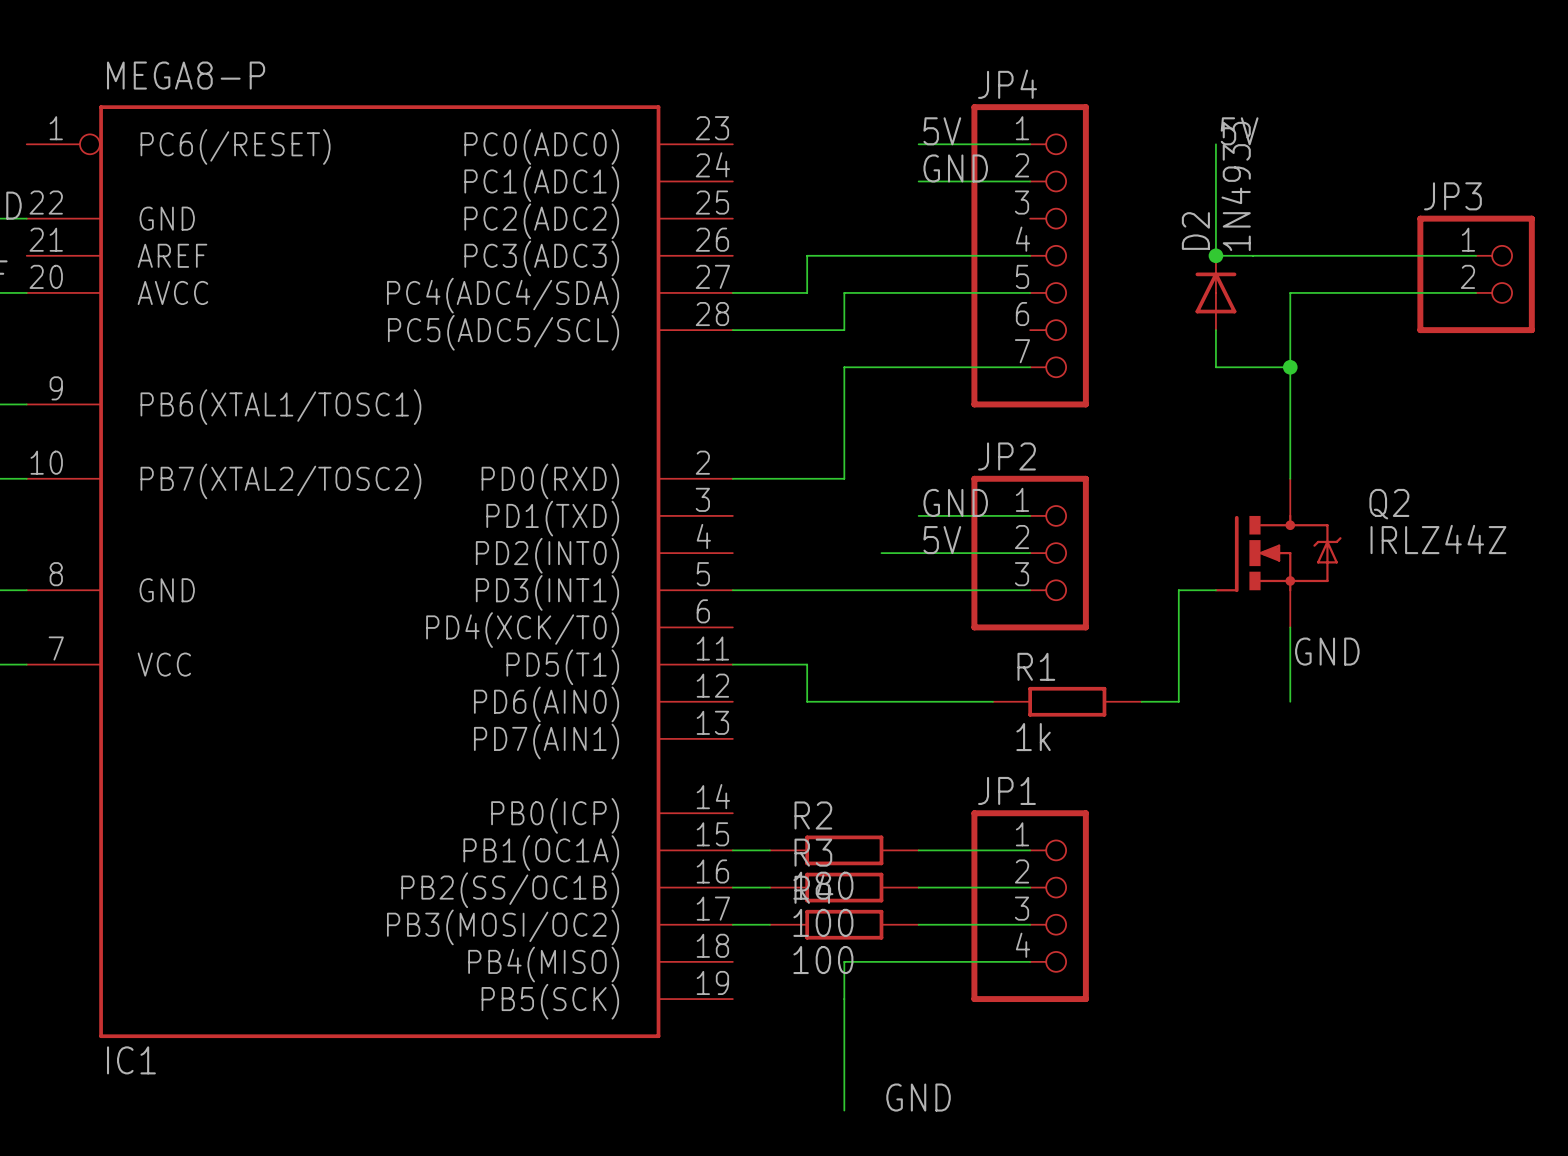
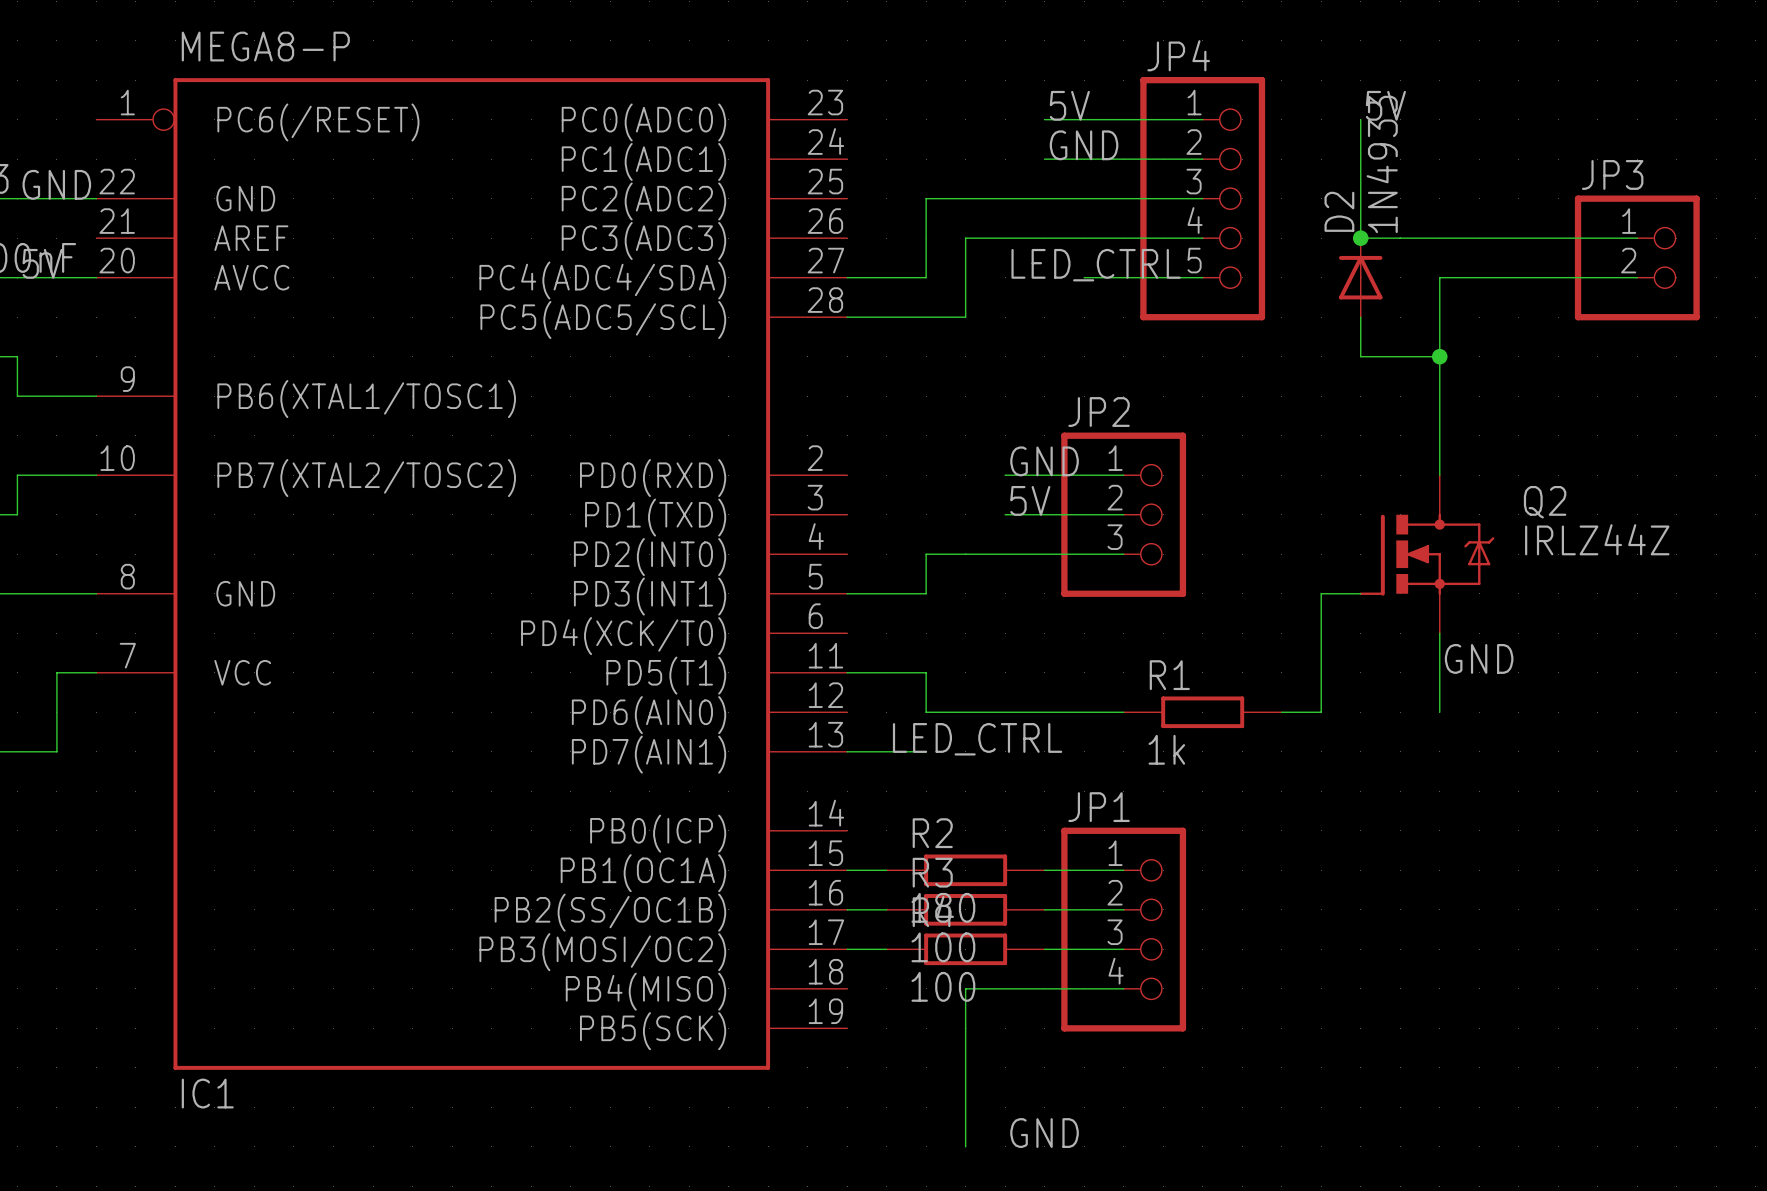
JP4 name position: JP4 (1007, 84) -> JP4 (1178, 55)
JP4 symbol: [971, 104, 1089, 408] -> [1140, 76, 1266, 321]
wire: none -> (1163, 119) (1202, 119)
wire: none -> (1163, 159) (1202, 159)
wire: none -> (1202, 198) (926, 198) (926, 238)
wire: (807, 255) (844, 255) -> (965, 277) (965, 238)
label: none -> LED_CTRL (1096, 265)
wire: (844, 292) (955, 292) -> (1005, 475) (1123, 475)
wire: (1030, 367) (844, 367) (844, 478) (732, 478) -> none
label position: GND (955, 502) -> GND (1044, 461)
wire: (992, 515) (1030, 515) -> (1163, 238) (1202, 238)
label position: 5V (942, 540) -> 5V (1030, 500)
wire: (992, 553) (1030, 553) -> (1163, 277) (1202, 277)
JP2 position: (1030, 553) -> (1123, 514)
wire: (807, 590) (1030, 590) -> (926, 593) (926, 554) (1005, 554)
label: none -> LED_CTRL (977, 739)
wire: none -> (847, 751) (926, 751)
wire: (992, 850) (1030, 850) -> (1005, 514) (1044, 514)
wire: (992, 887) (1030, 887) -> none
JP1 position: (1030, 906) -> (1123, 929)
wire: (992, 924) (1030, 924) -> none
wire: (992, 961) (1030, 961) -> none

